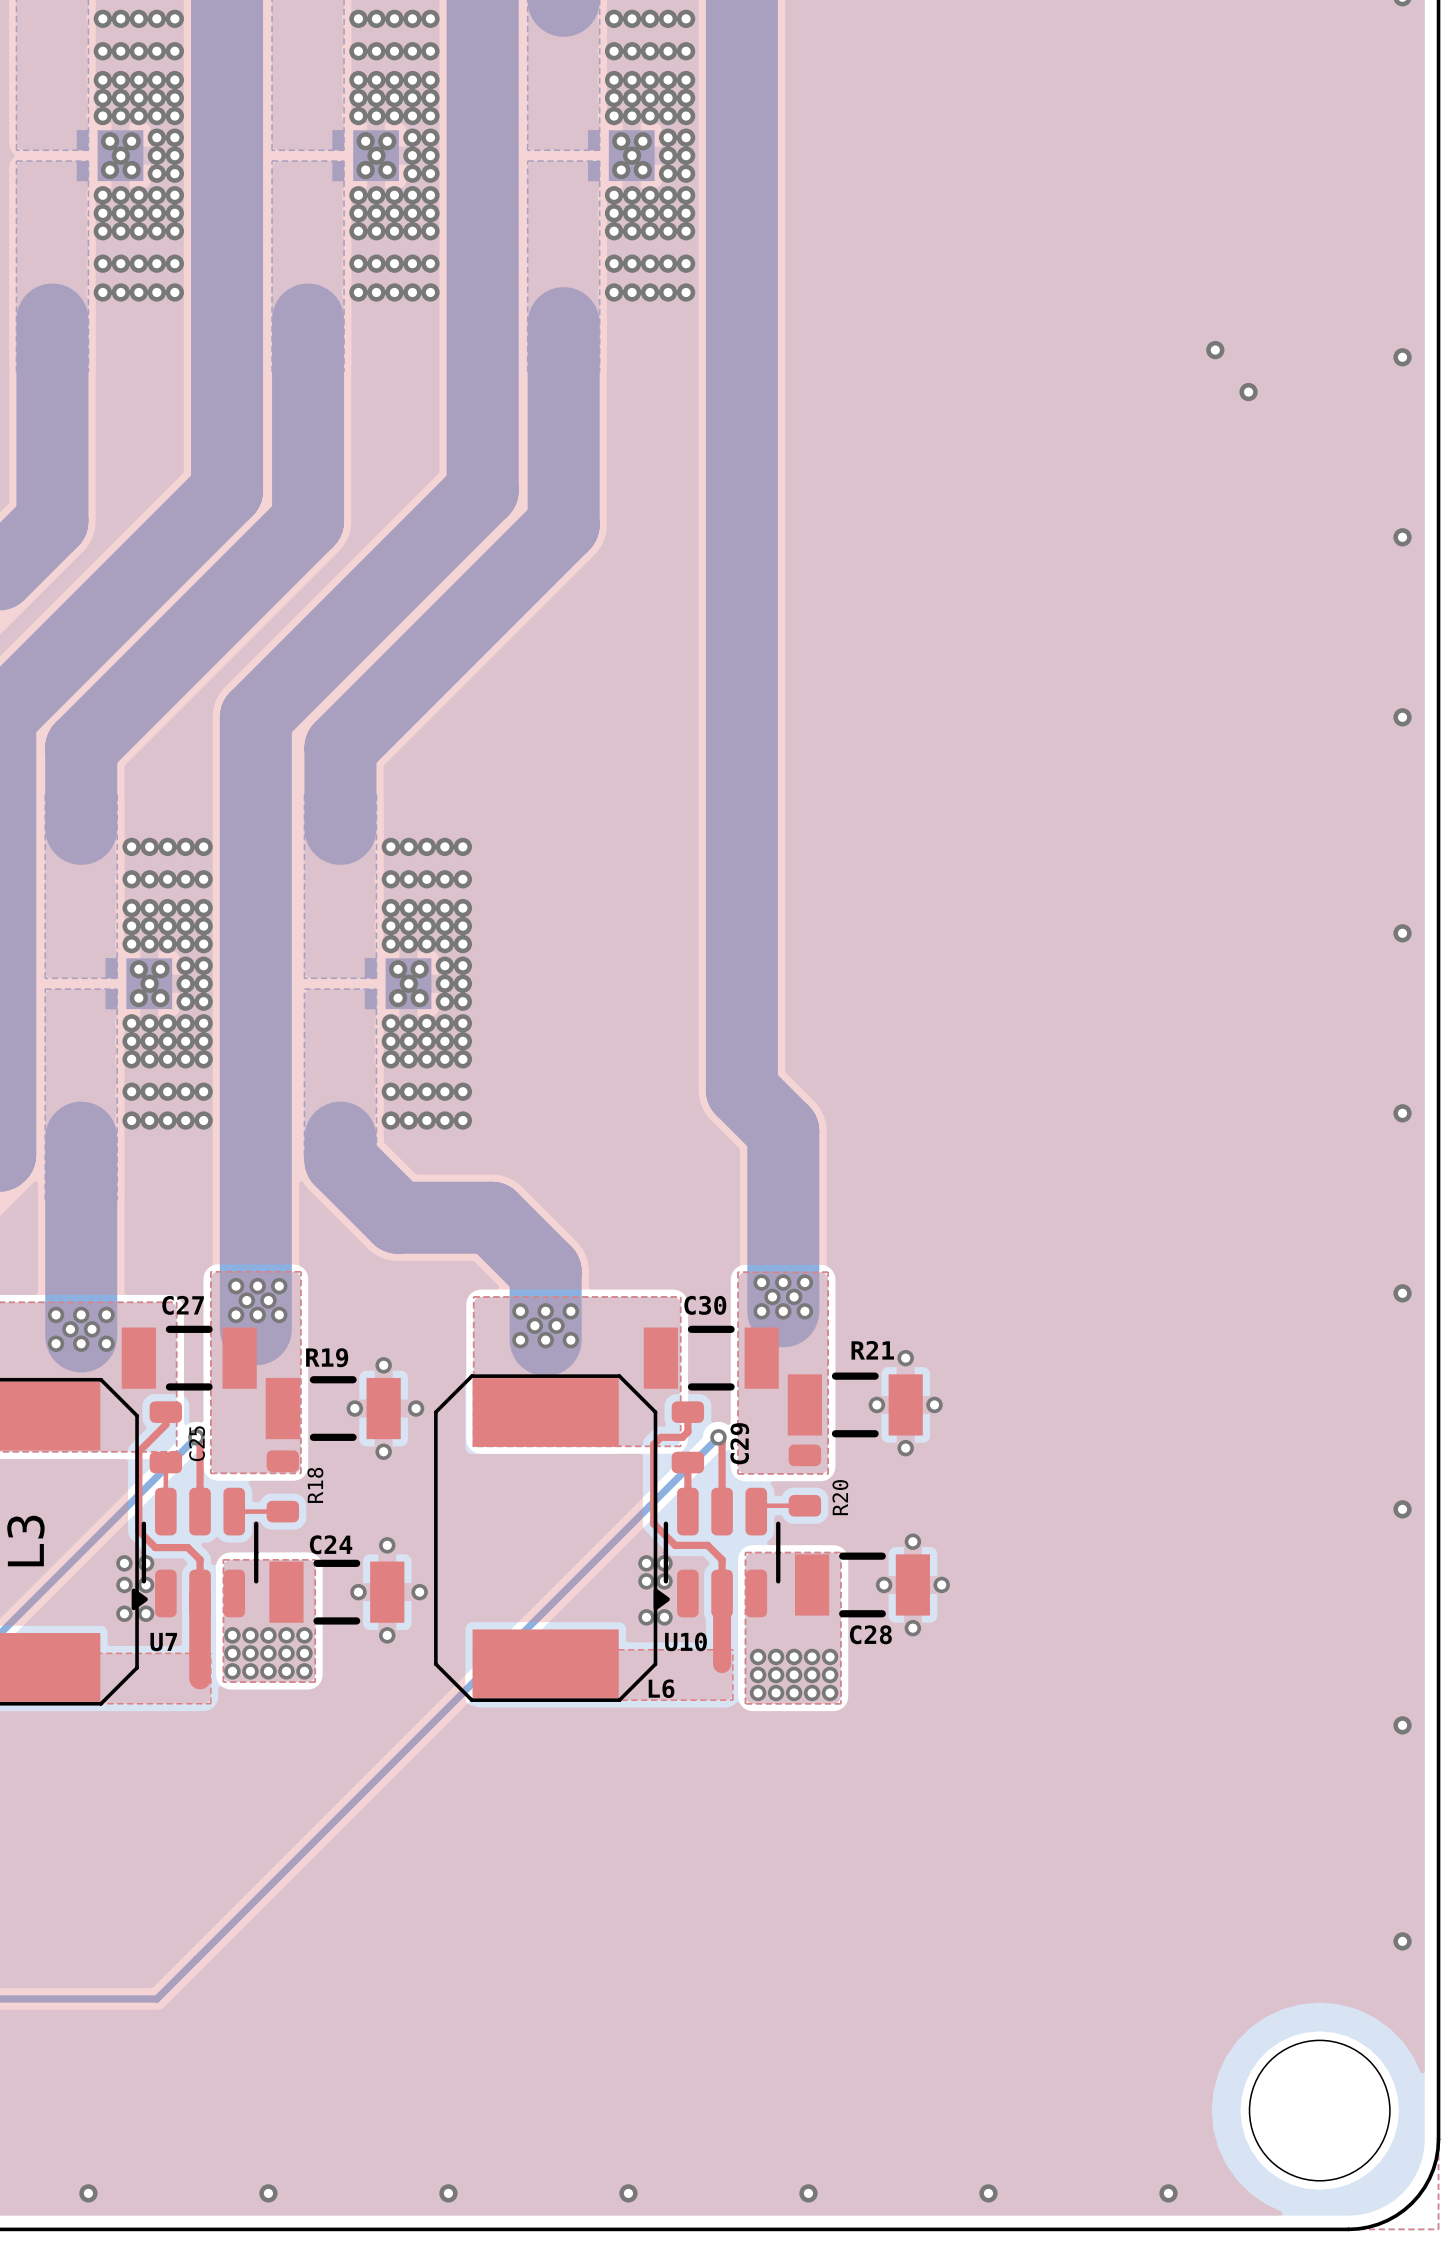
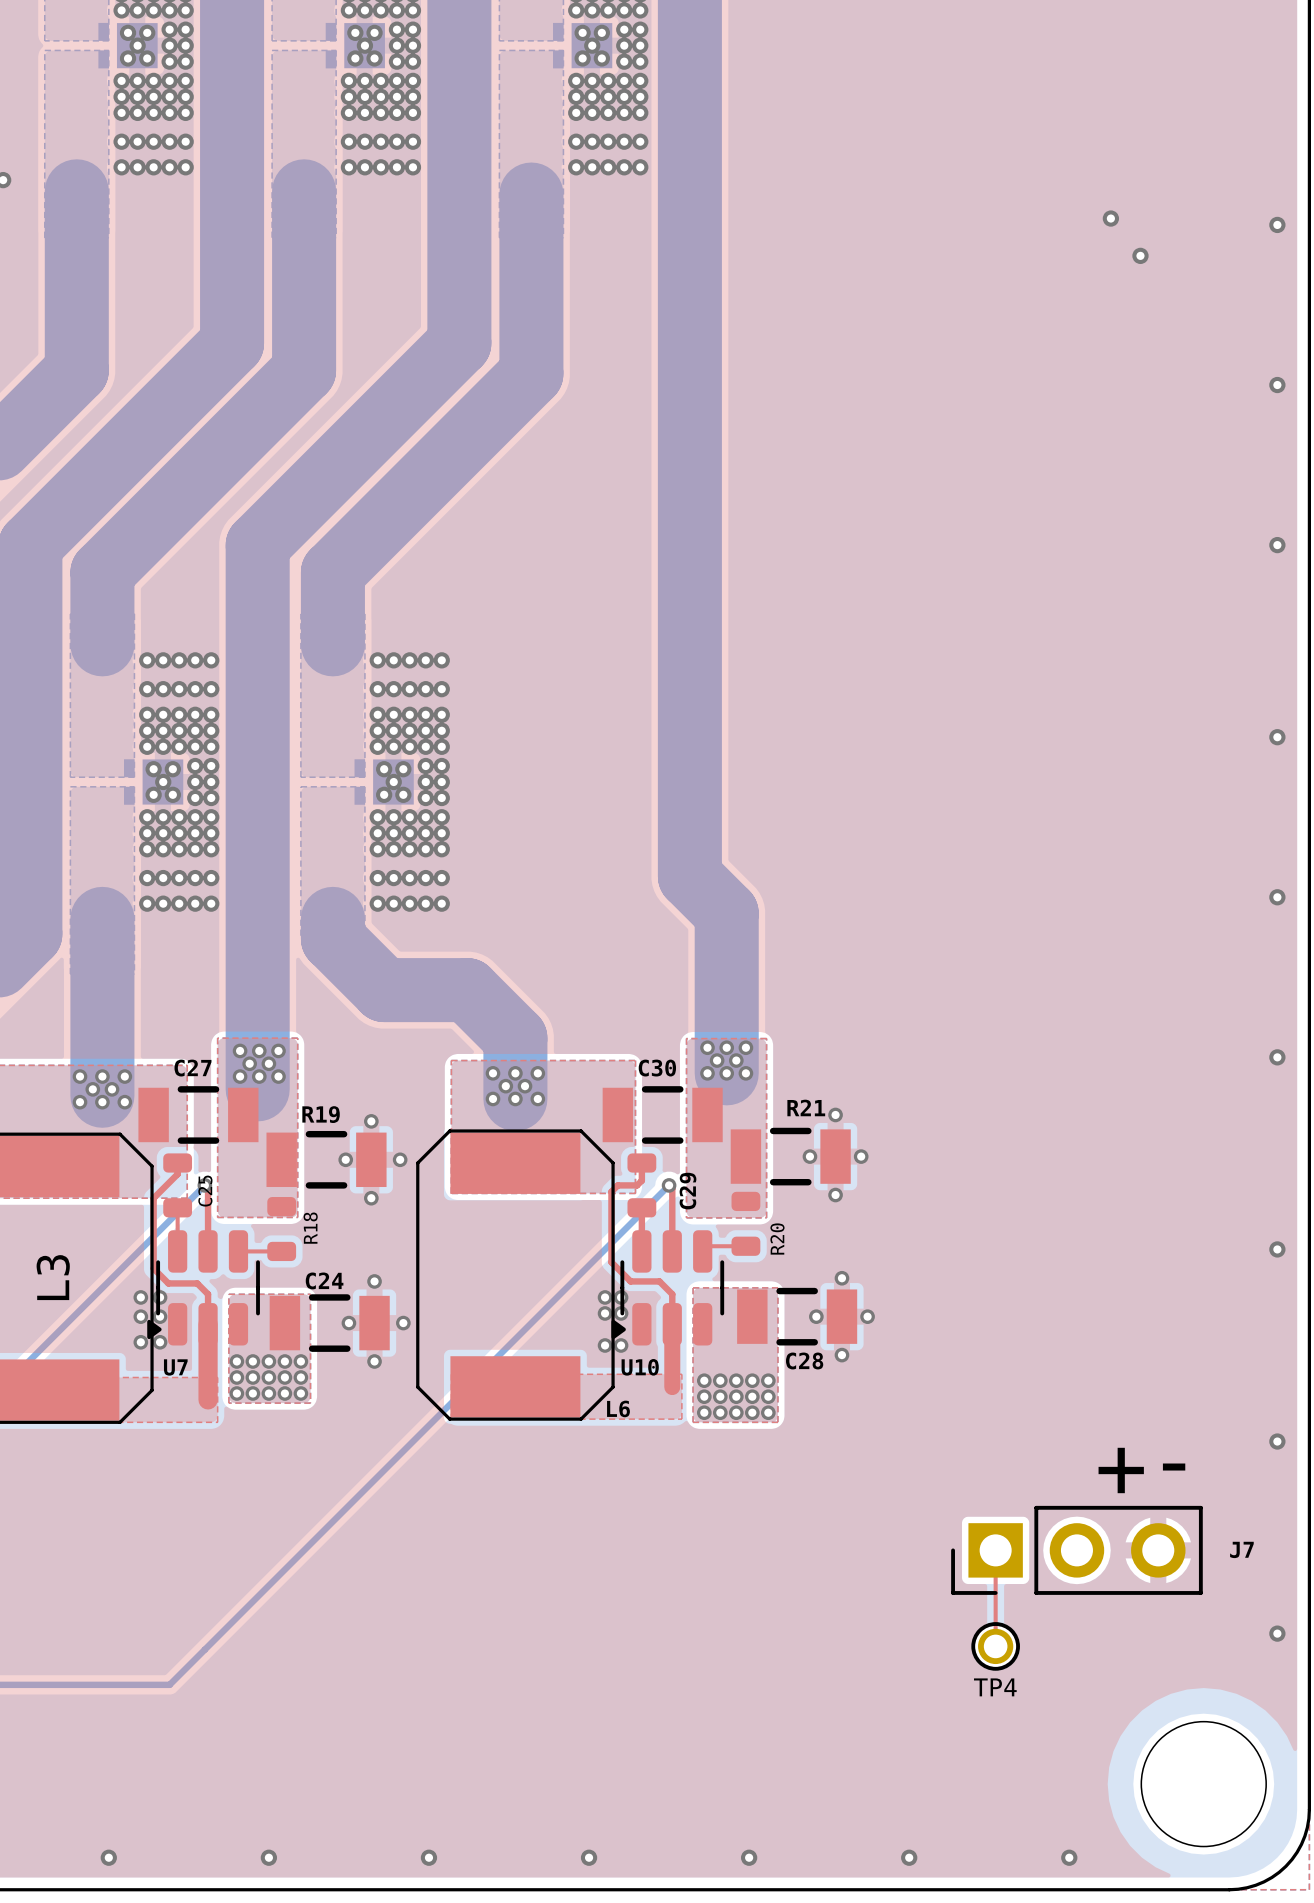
text: none -> -+ (1141, 1470)
top track: none -> (995, 1550) (995, 1646)
J7: none -> (1076, 1550)
TP4: none -> (995, 1646)

